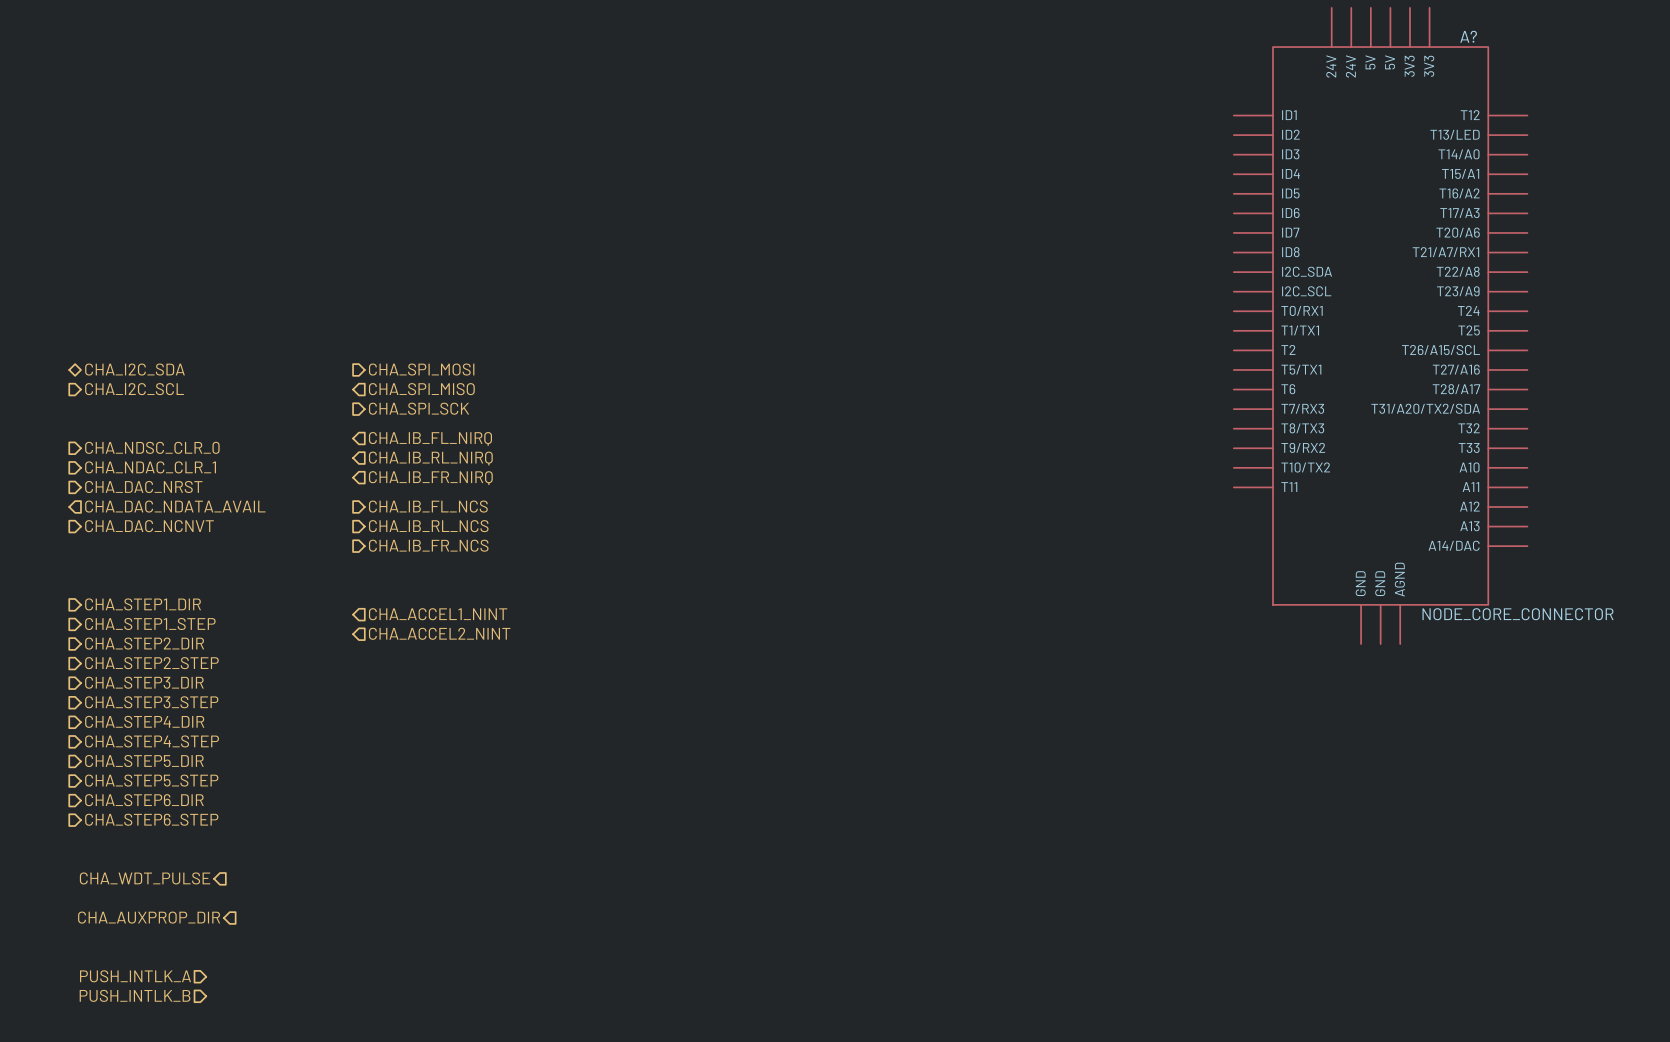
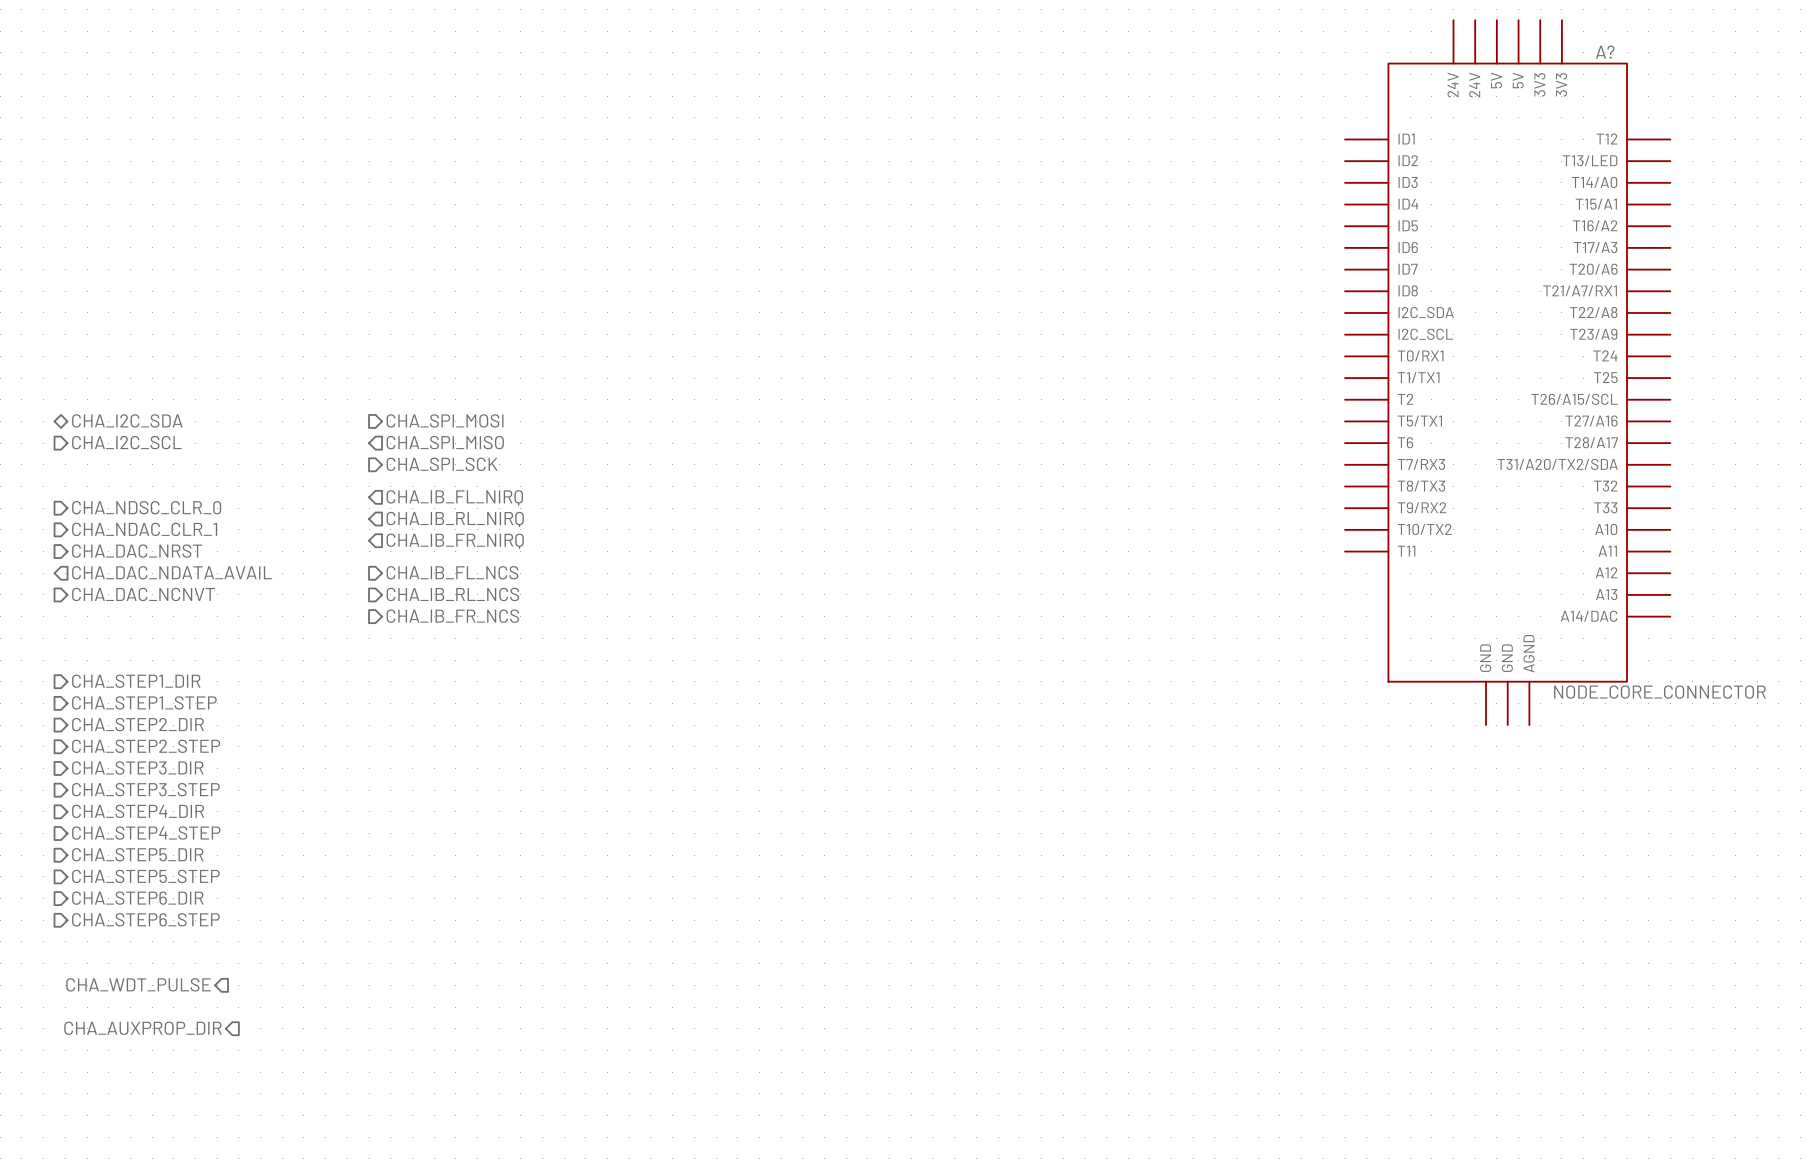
hierarchical label: CHA_ACCEL1_NINT (438, 614) -> none
hierarchical label: CHA_ACCEL2_NINT (439, 633) -> none
hierarchical label: PUSH_INTLK_A (135, 976) -> none
hierarchical label: PUSH_INTLK_B (135, 995) -> none

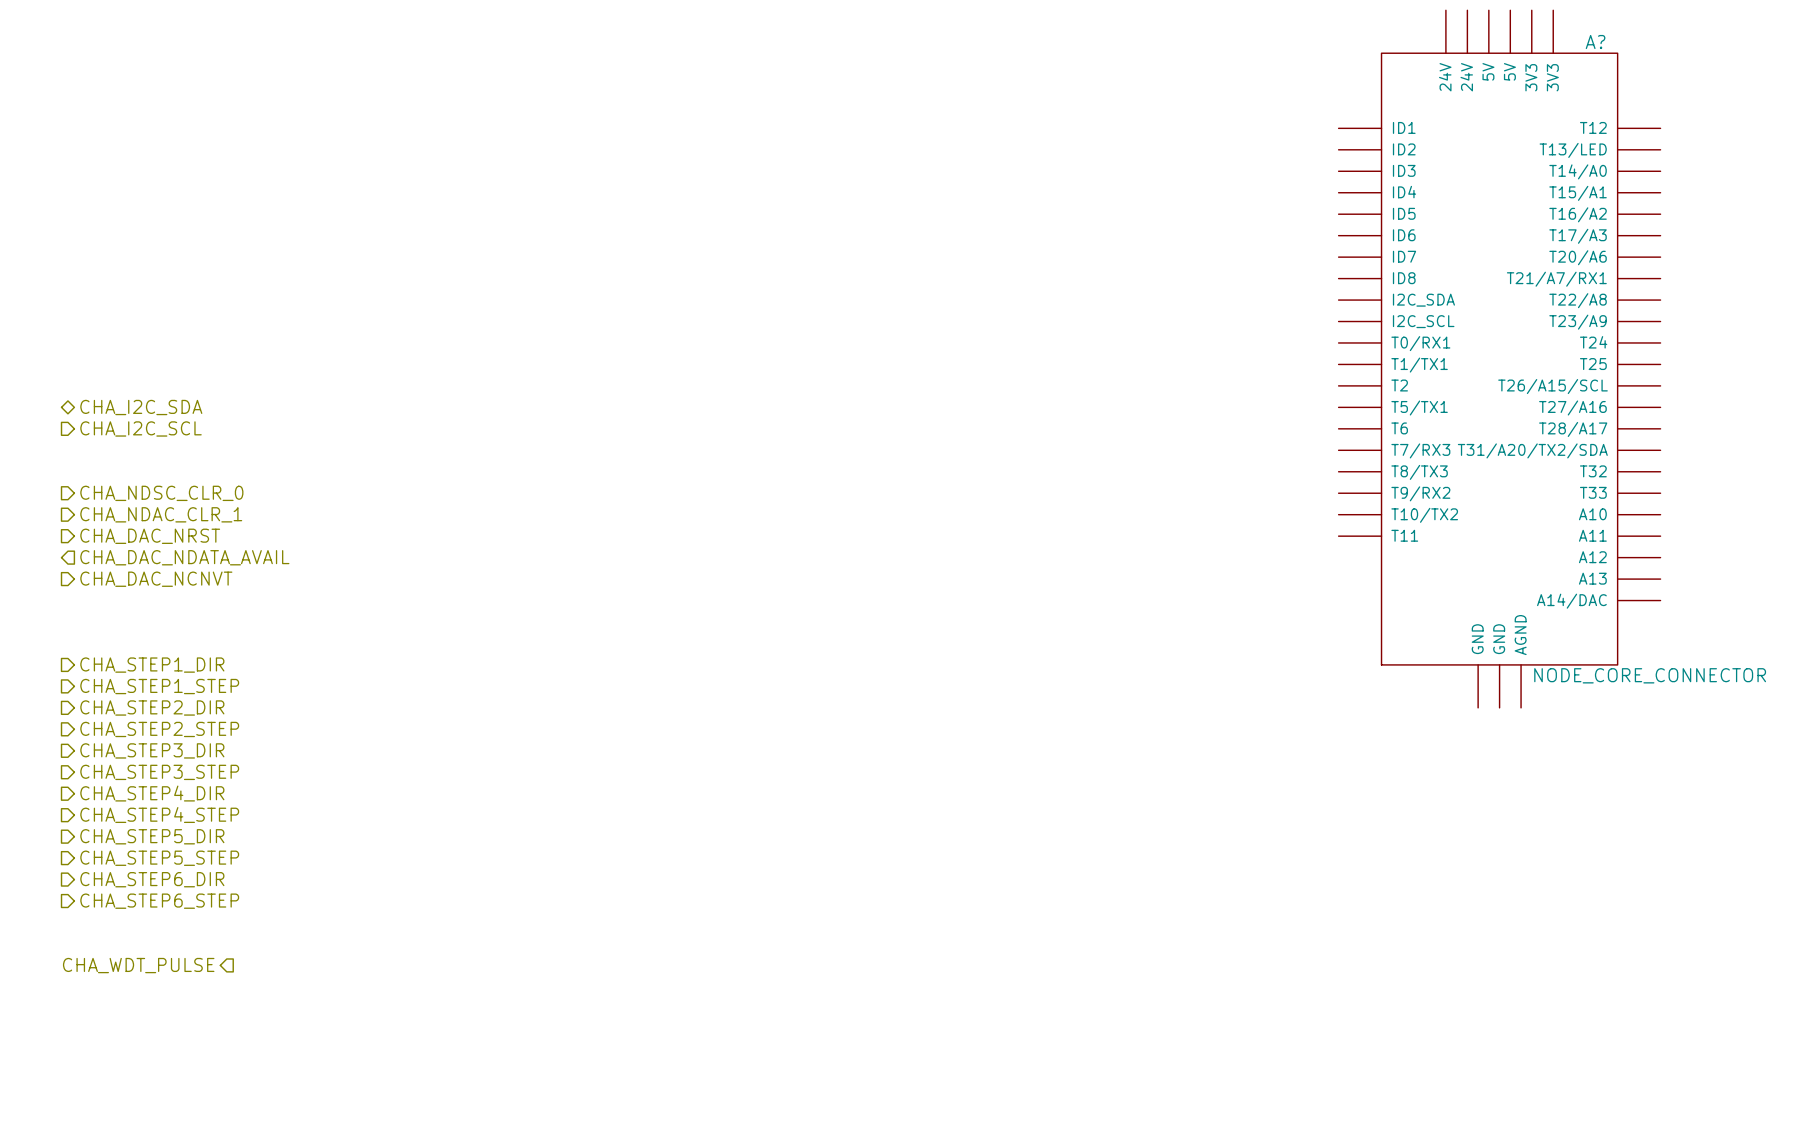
hierarchical label: CHA_SPI_MOSI (445, 420) -> none
hierarchical label: CHA_SPI_MISO (445, 442) -> none
hierarchical label: CHA_SPI_SCK (442, 464) -> none
hierarchical label: CHA_IB_FL_NIRQ (454, 497) -> none
hierarchical label: CHA_IB_RL_NIRQ (455, 519) -> none
hierarchical label: CHA_IB_FR_NIRQ (455, 541) -> none
hierarchical label: CHA_IB_FL_NCS (452, 572) -> none
hierarchical label: CHA_IB_RL_NCS (452, 594) -> none
hierarchical label: CHA_IB_FR_NCS (452, 616) -> none
hierarchical label: CHA_AUXPROP_DIR (143, 1028) -> none

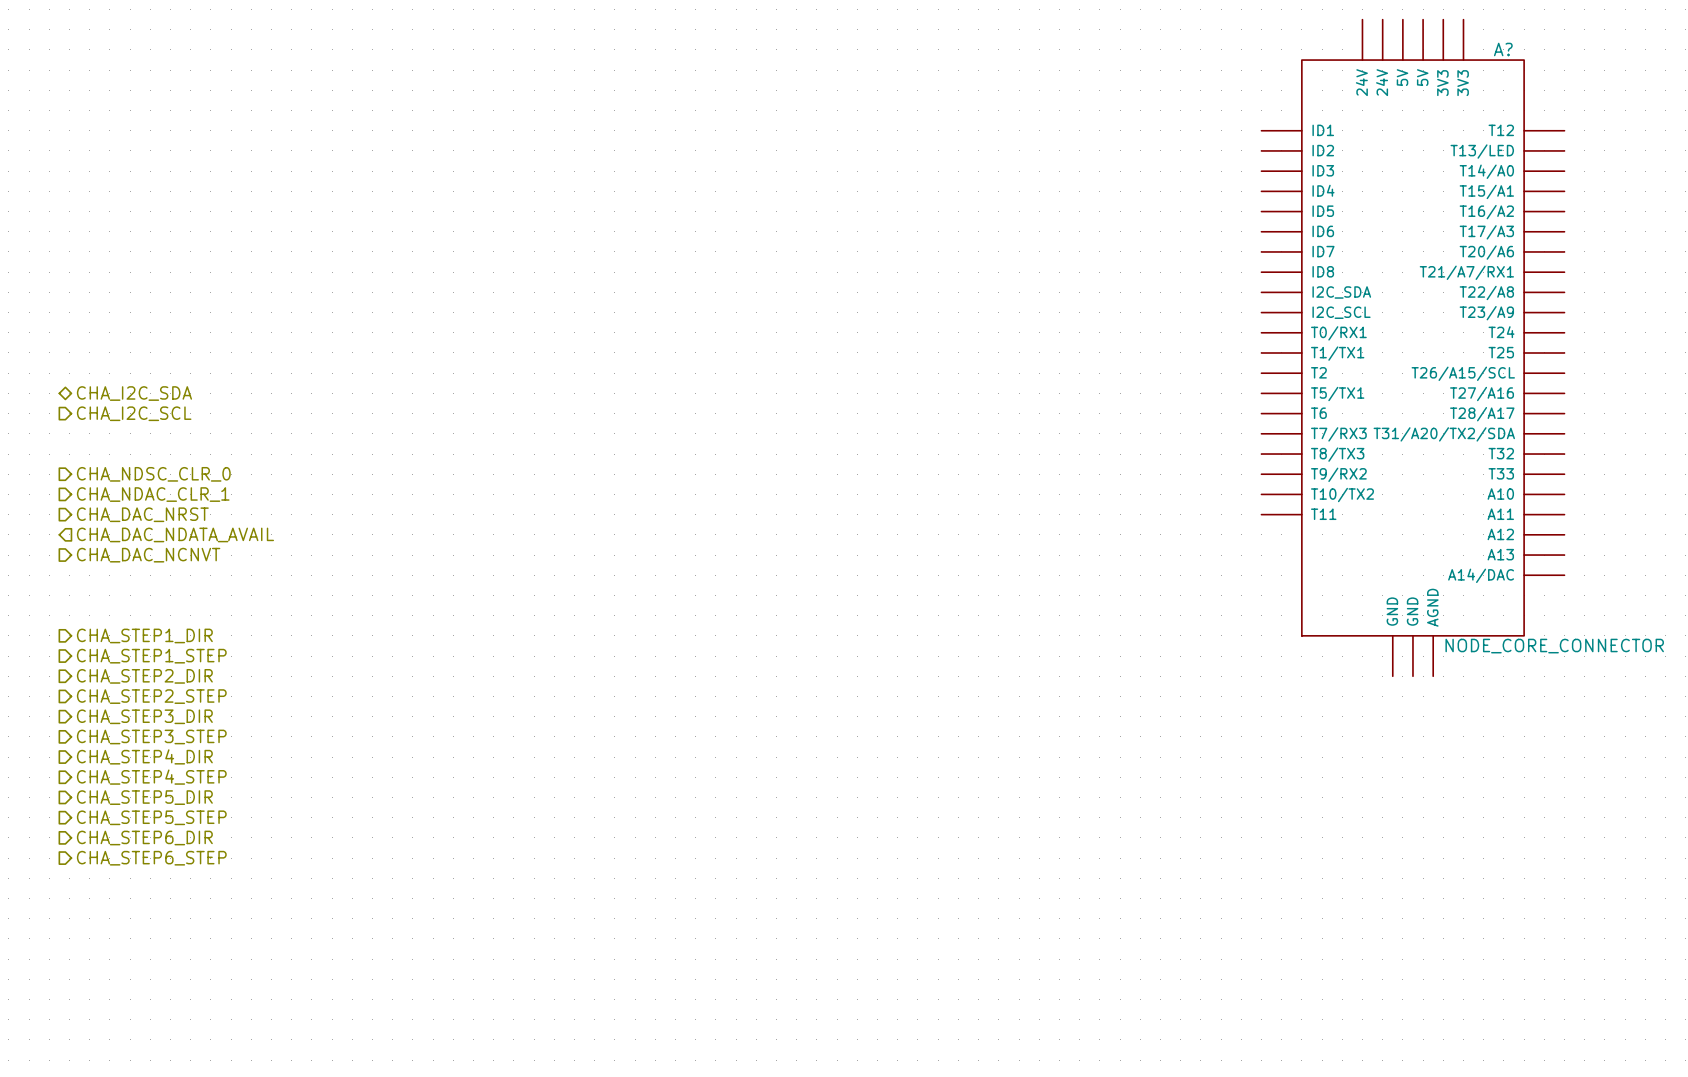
hierarchical label: CHA_WDT_PULSE (138, 965) -> none

